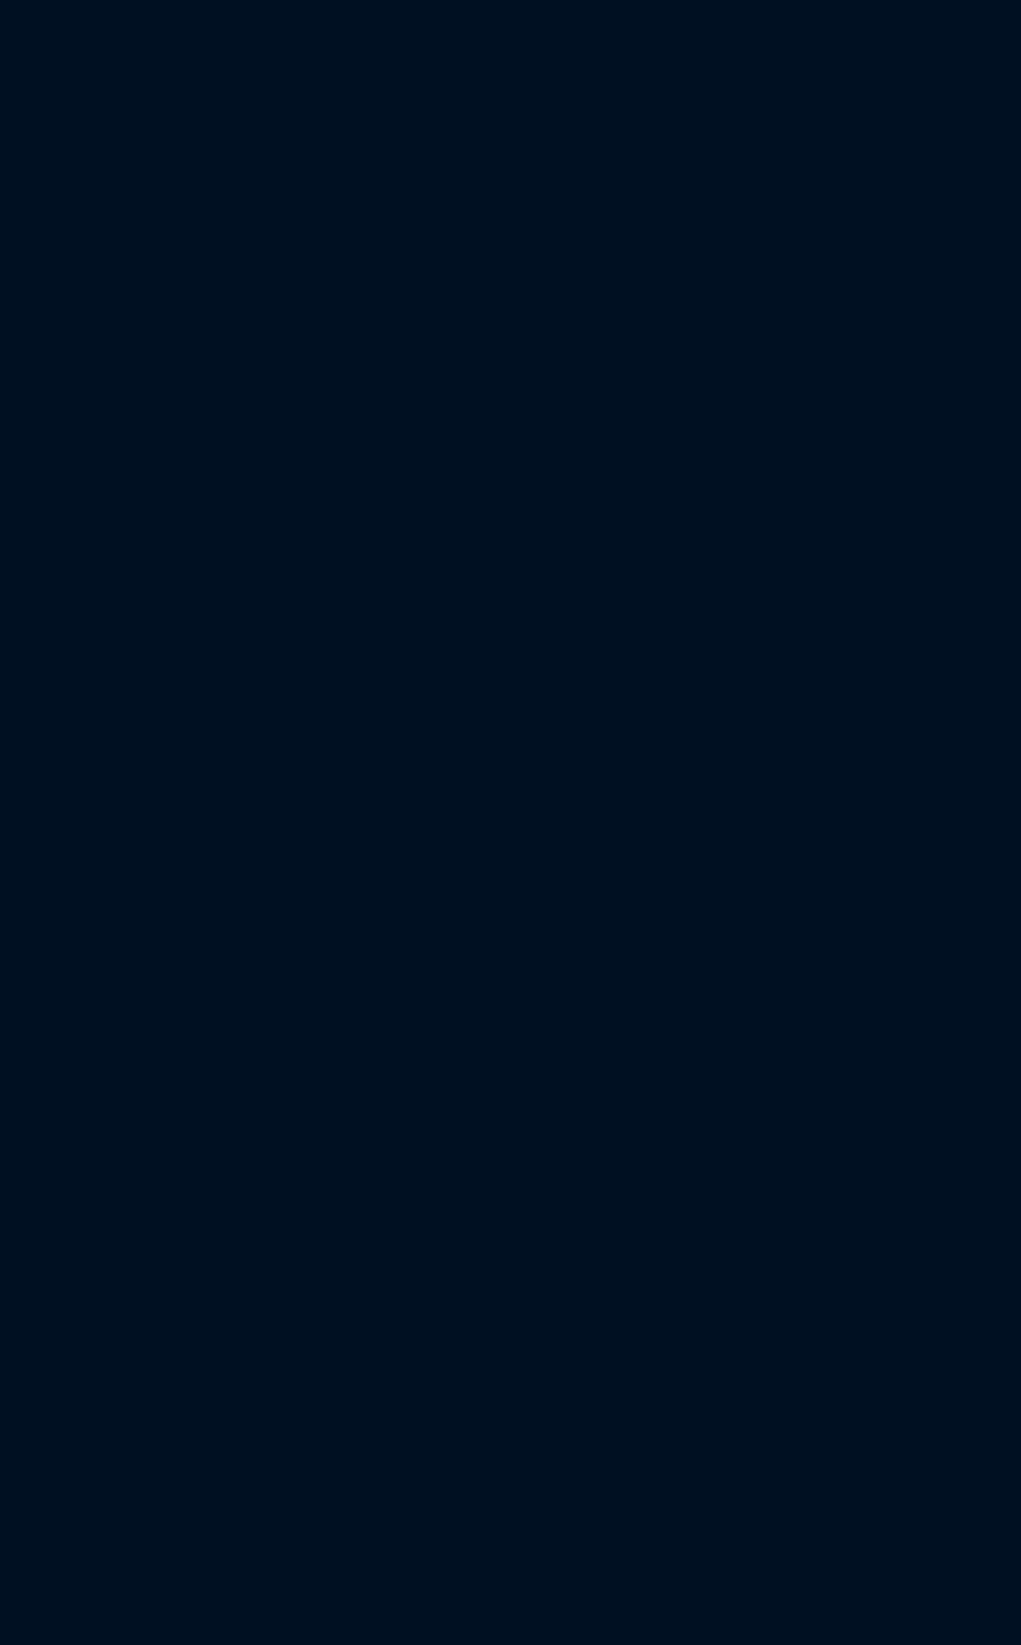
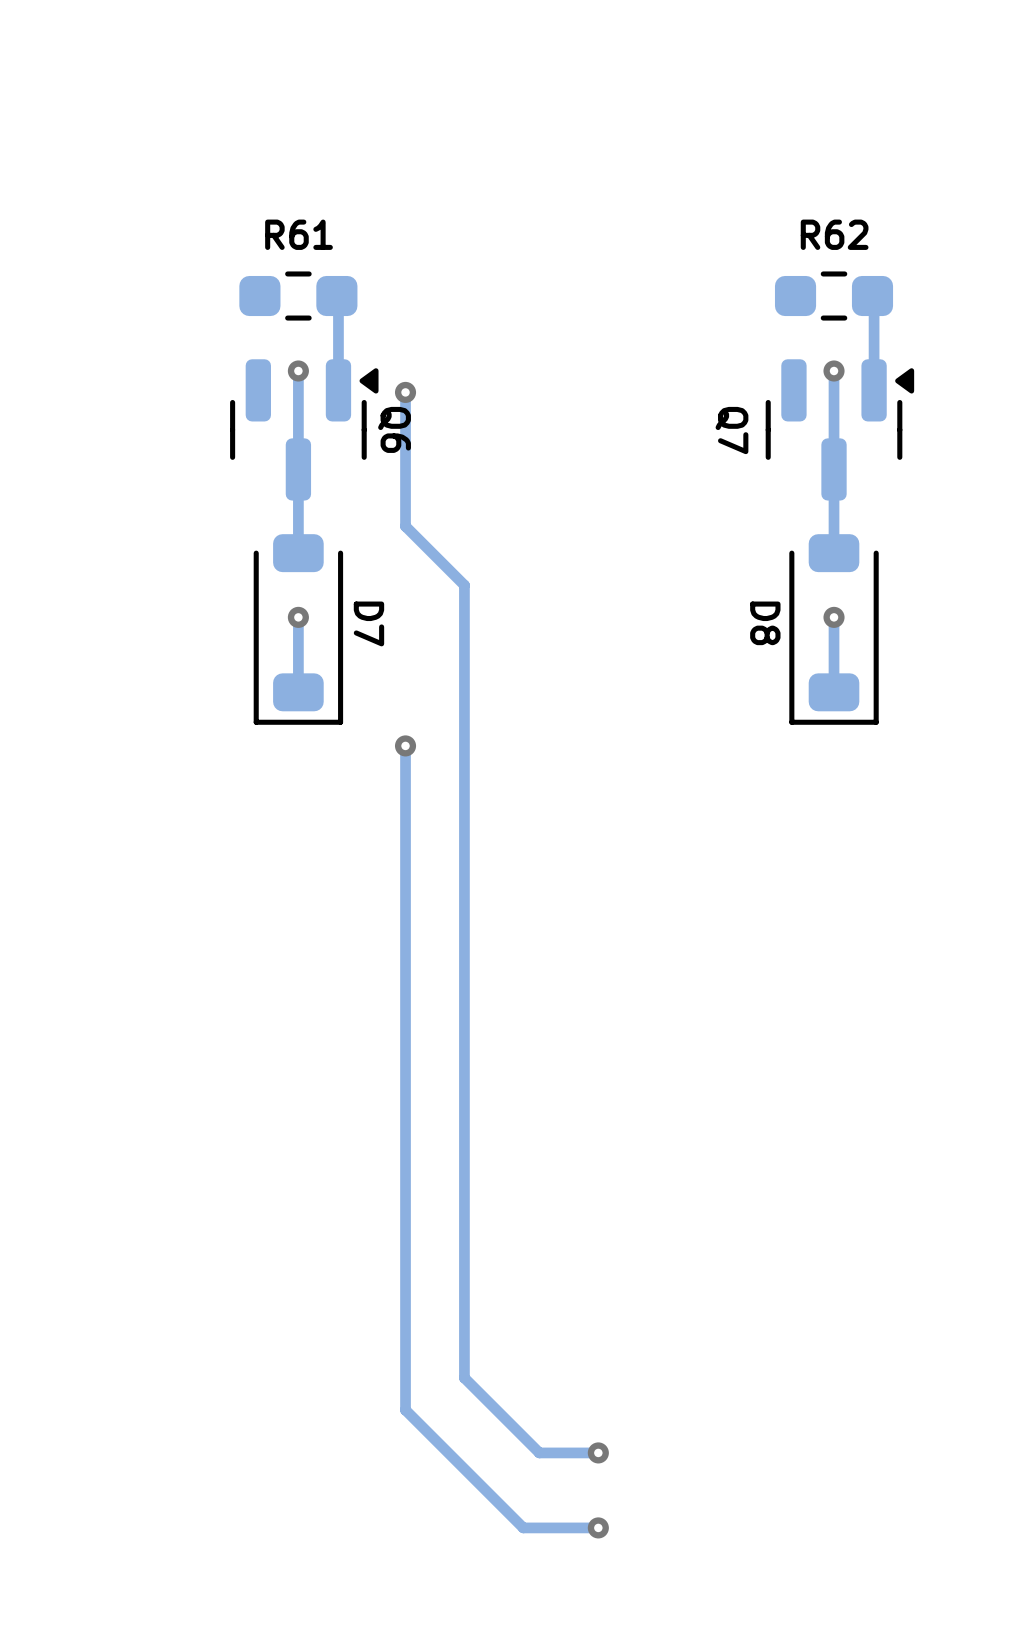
R61: none -> (298, 296)
track: none -> (336, 296) (338, 297) (338, 390)
R62: none -> (834, 296)
track: none -> (872, 296) (874, 297) (874, 390)
track: none -> (298, 370) (298, 553)
via: none -> (298, 370)
track: none -> (834, 370) (834, 553)
via: none -> (834, 370)
track: none -> (405, 392) (405, 526) (464, 585) (464, 1377) (539, 1452) (598, 1452)
via: none -> (405, 392)
Q6: none -> (304, 429)
Q7: none -> (839, 429)
track: none -> (298, 617) (298, 692)
via: none -> (298, 617)
track: none -> (834, 617) (834, 692)
via: none -> (834, 617)
D7: none -> (298, 629)
D8: none -> (834, 629)
track: none -> (405, 745) (405, 1410) (523, 1527) (598, 1527)
via: none -> (405, 745)
via: none -> (598, 1452)
via: none -> (598, 1527)

